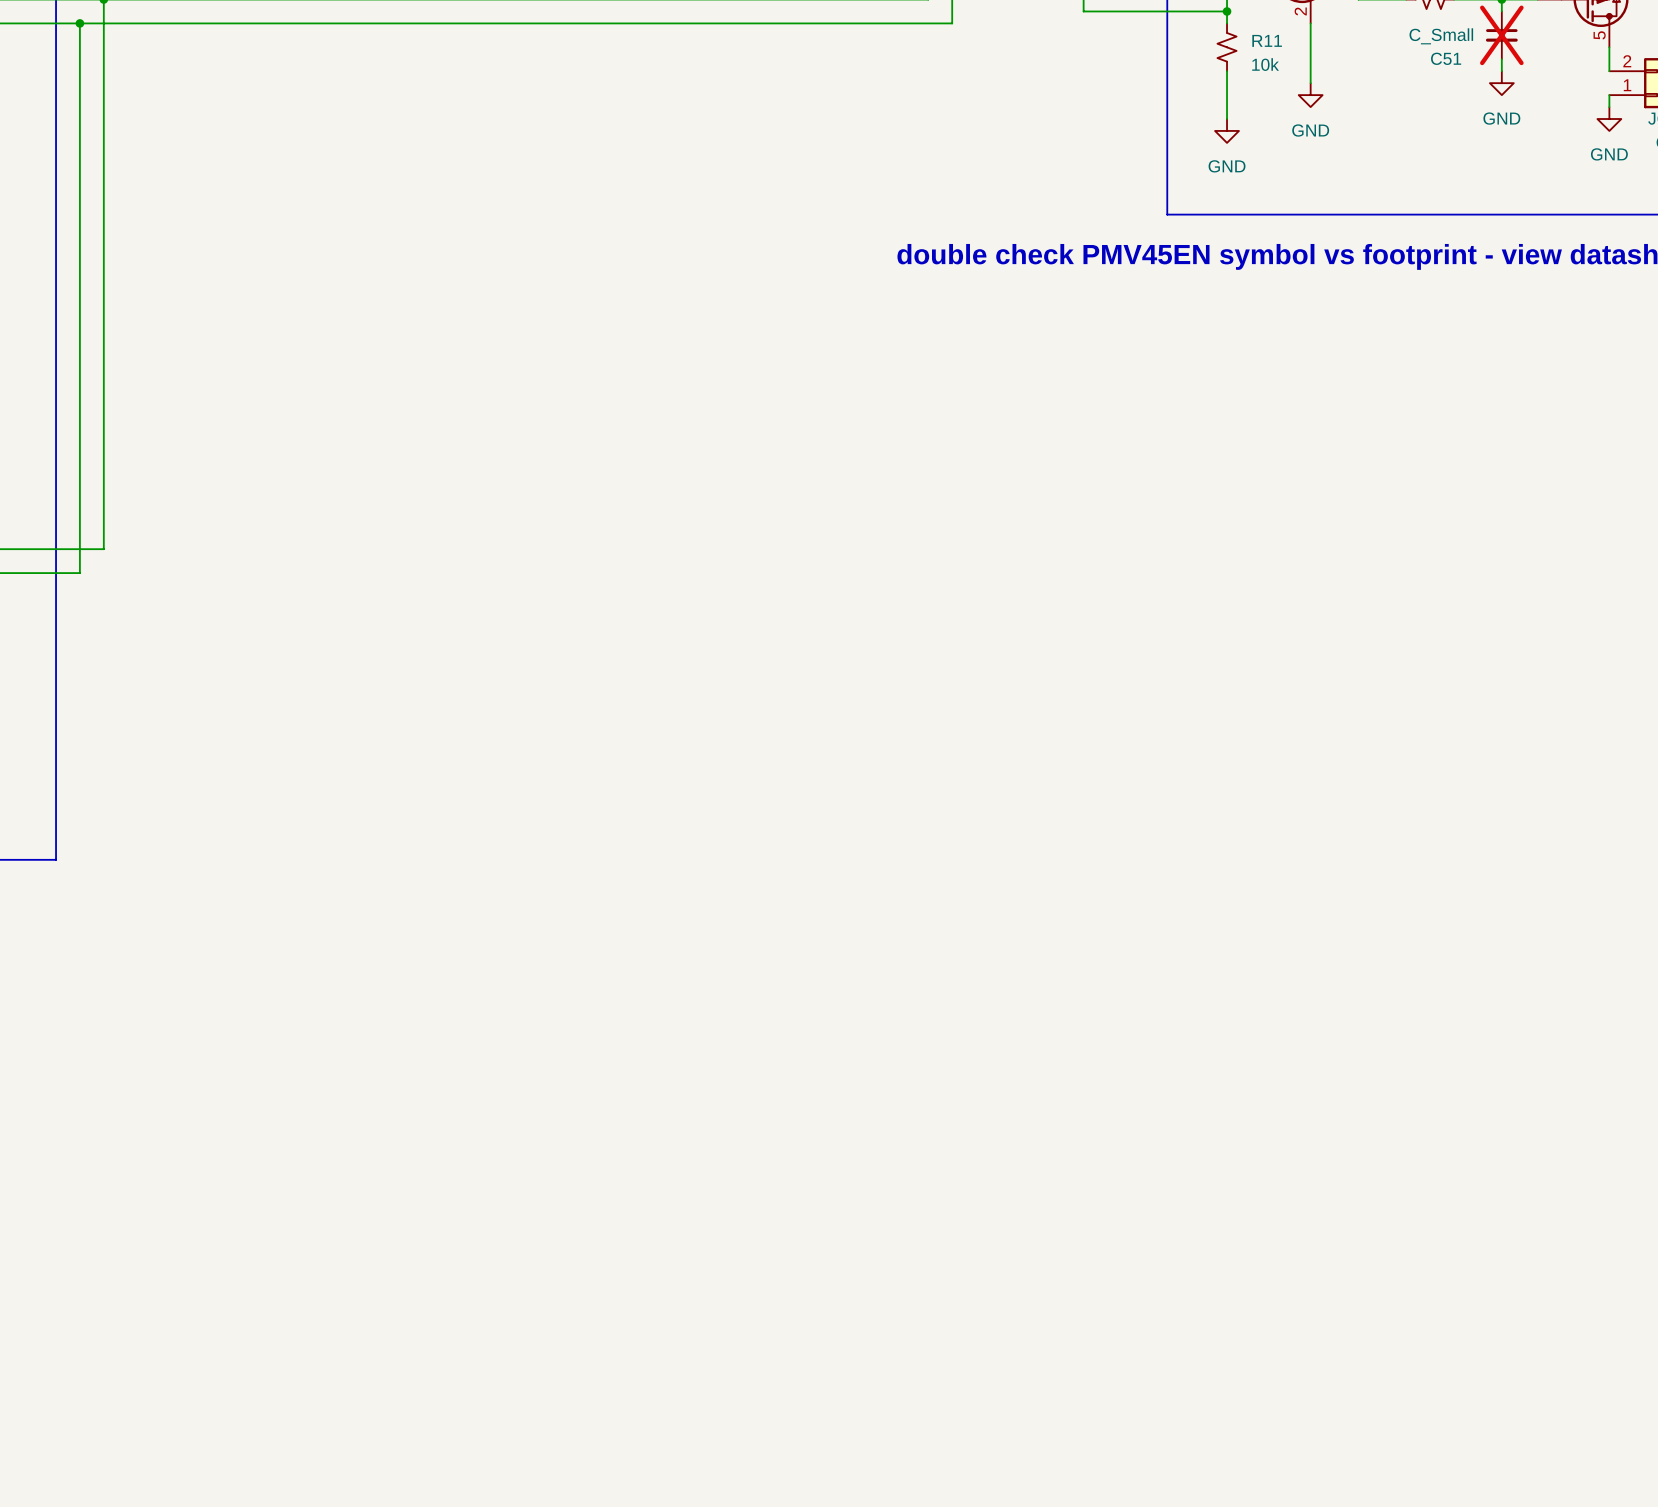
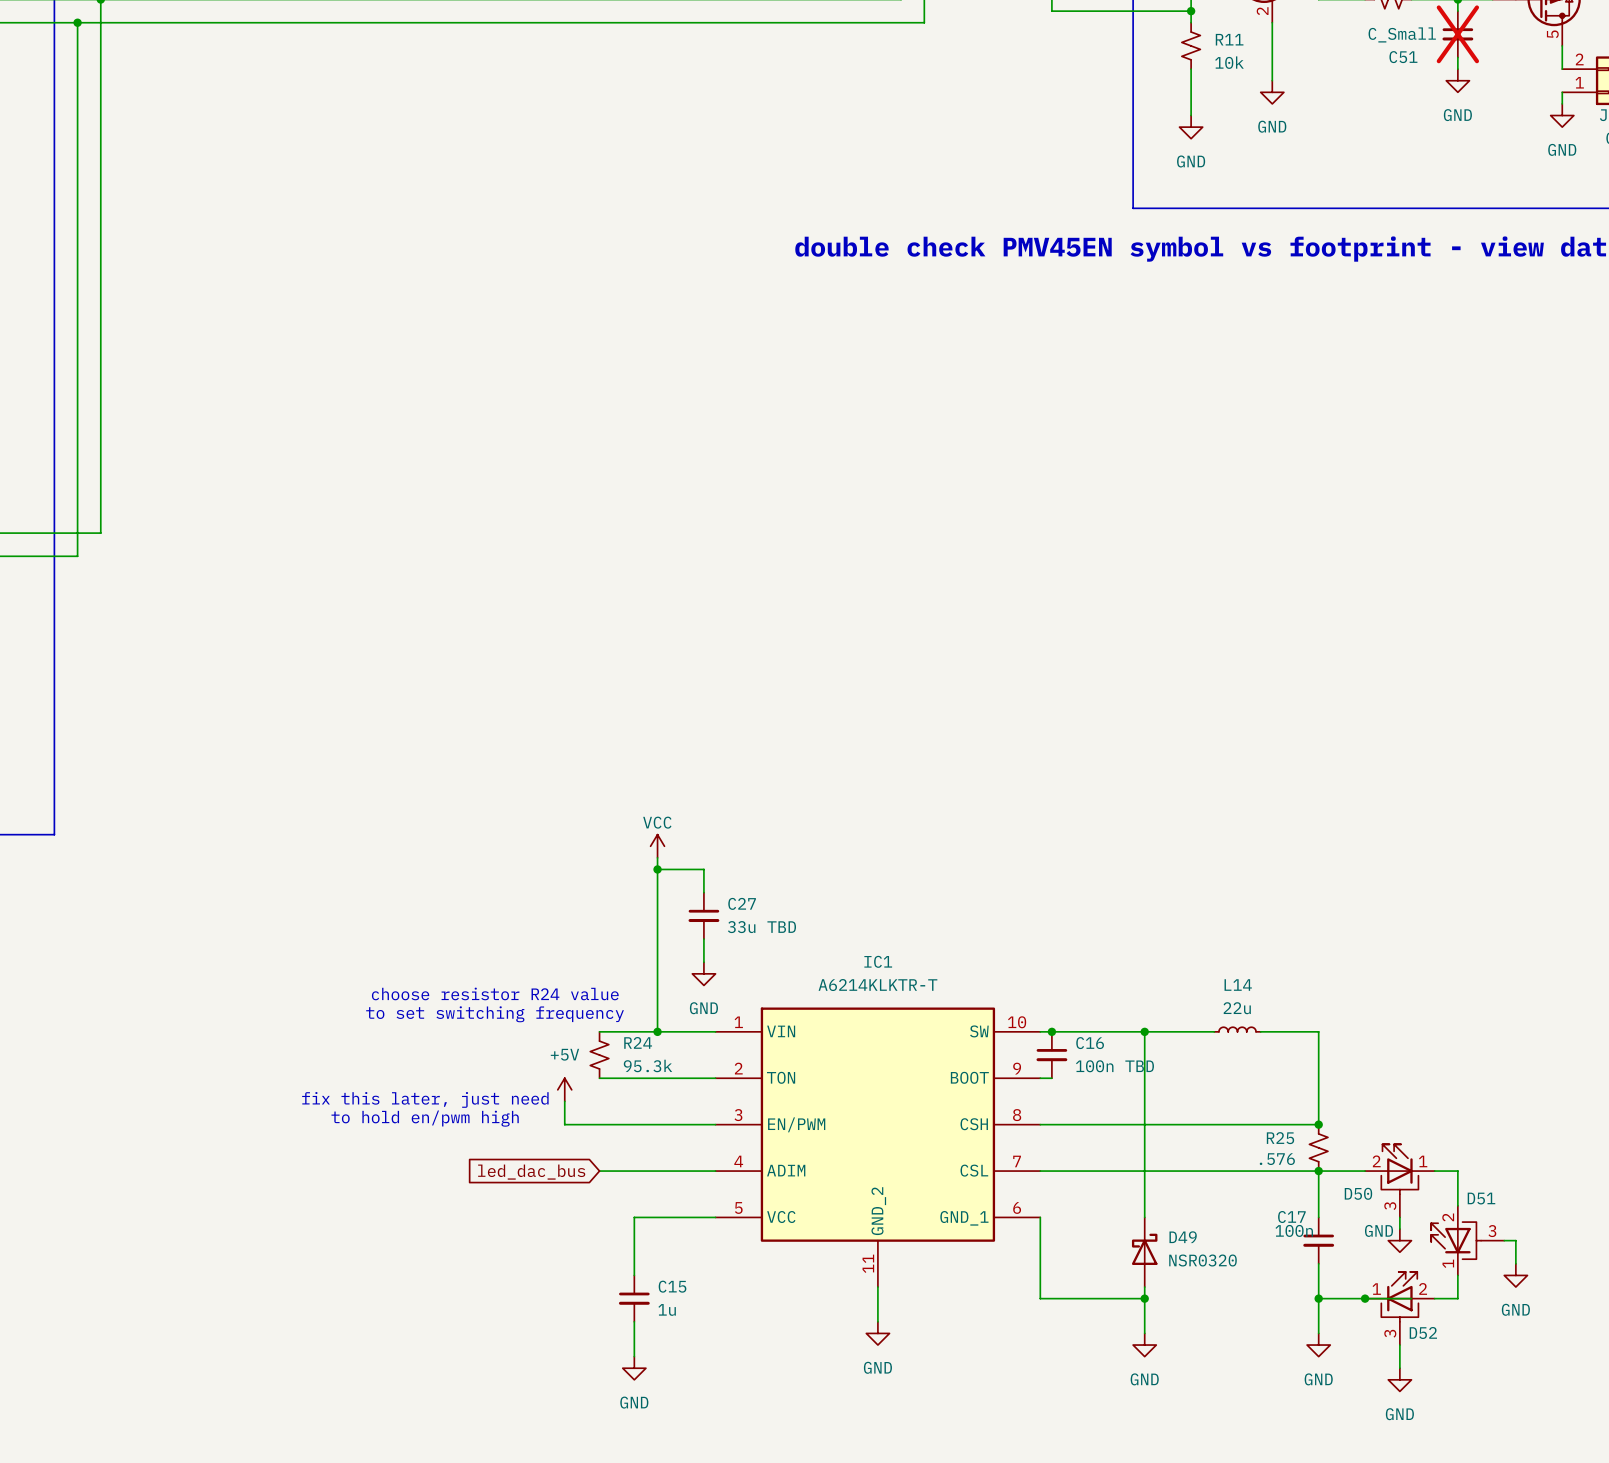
power symbol: none -> VCC (657, 846)
wire: none -> (657, 857) (657, 1031)
wire: none -> (657, 869) (703, 869) (703, 892)
junction: none -> (657, 869)
C27: none -> 33u TBD (703, 915)
wire: none -> (703, 939) (703, 962)
power symbol: none -> GND (703, 973)
text: none -> choose resistor R24 value (495, 993)
text: none -> to set switching frequency (495, 1014)
L14: none -> 22u (1237, 1029)
wire: none -> (599, 1031) (715, 1031)
junction: none -> (657, 1031)
wire: none -> (1040, 1031) (1214, 1031)
junction: none -> (1051, 1031)
wire: none -> (1144, 1031) (1144, 1217)
junction: none -> (1144, 1031)
wire: none -> (1260, 1031) (1318, 1031) (1318, 1124) (1040, 1124)
R24: none -> 95.3k (599, 1055)
C16: none -> 100n TBD (1051, 1055)
wire: none -> (599, 1078) (715, 1078)
wire: none -> (1040, 1078) (1051, 1078)
power symbol: none -> +5V (564, 1089)
text: none -> fix this later, just need (425, 1099)
wire: none -> (564, 1101) (564, 1124) (715, 1124)
text: none -> to hold en/pwm high (425, 1118)
junction: none -> (1318, 1124)
IC1: none -> A6214KLKTR-T (877, 1147)
R25: none -> .576 (1318, 1147)
wire: none -> (599, 1171) (715, 1171)
wire: none -> (1040, 1171) (1365, 1171)
wire: none -> (1318, 1171) (1318, 1217)
junction: none -> (1318, 1171)
wire: none -> (1434, 1171) (1457, 1171) (1457, 1205)
global label: none -> led_dac_bus (531, 1172)
D50: none -> (1399, 1180)
wire: none -> (715, 1217) (634, 1217) (634, 1275)
wire: none -> (1040, 1217) (1040, 1298) (1144, 1298)
wire: none -> (1399, 1217) (1399, 1229)
C17: none -> 100n (1318, 1240)
power symbol: none -> GND (1399, 1240)
D51: none -> (1467, 1240)
wire: none -> (1504, 1240) (1515, 1240) (1515, 1263)
D49: none -> NSR0320 (1144, 1252)
wire: none -> (1318, 1263) (1318, 1333)
wire: none -> (1457, 1275) (1457, 1298) (1434, 1298)
power symbol: none -> GND (1515, 1275)
wire: none -> (877, 1287) (877, 1321)
wire: none -> (1144, 1287) (1144, 1333)
C15: none -> 1u (634, 1298)
junction: none -> (1144, 1298)
wire: none -> (1318, 1298) (1411, 1298)
junction: none -> (1318, 1298)
junction: none -> (1365, 1298)
D52: none -> (1399, 1308)
wire: none -> (634, 1321) (634, 1356)
power symbol: none -> GND (877, 1333)
power symbol: none -> GND (1144, 1345)
power symbol: none -> GND (1318, 1345)
wire: none -> (1399, 1345) (1399, 1368)
power symbol: none -> GND (634, 1368)
power symbol: none -> GND (1399, 1379)

